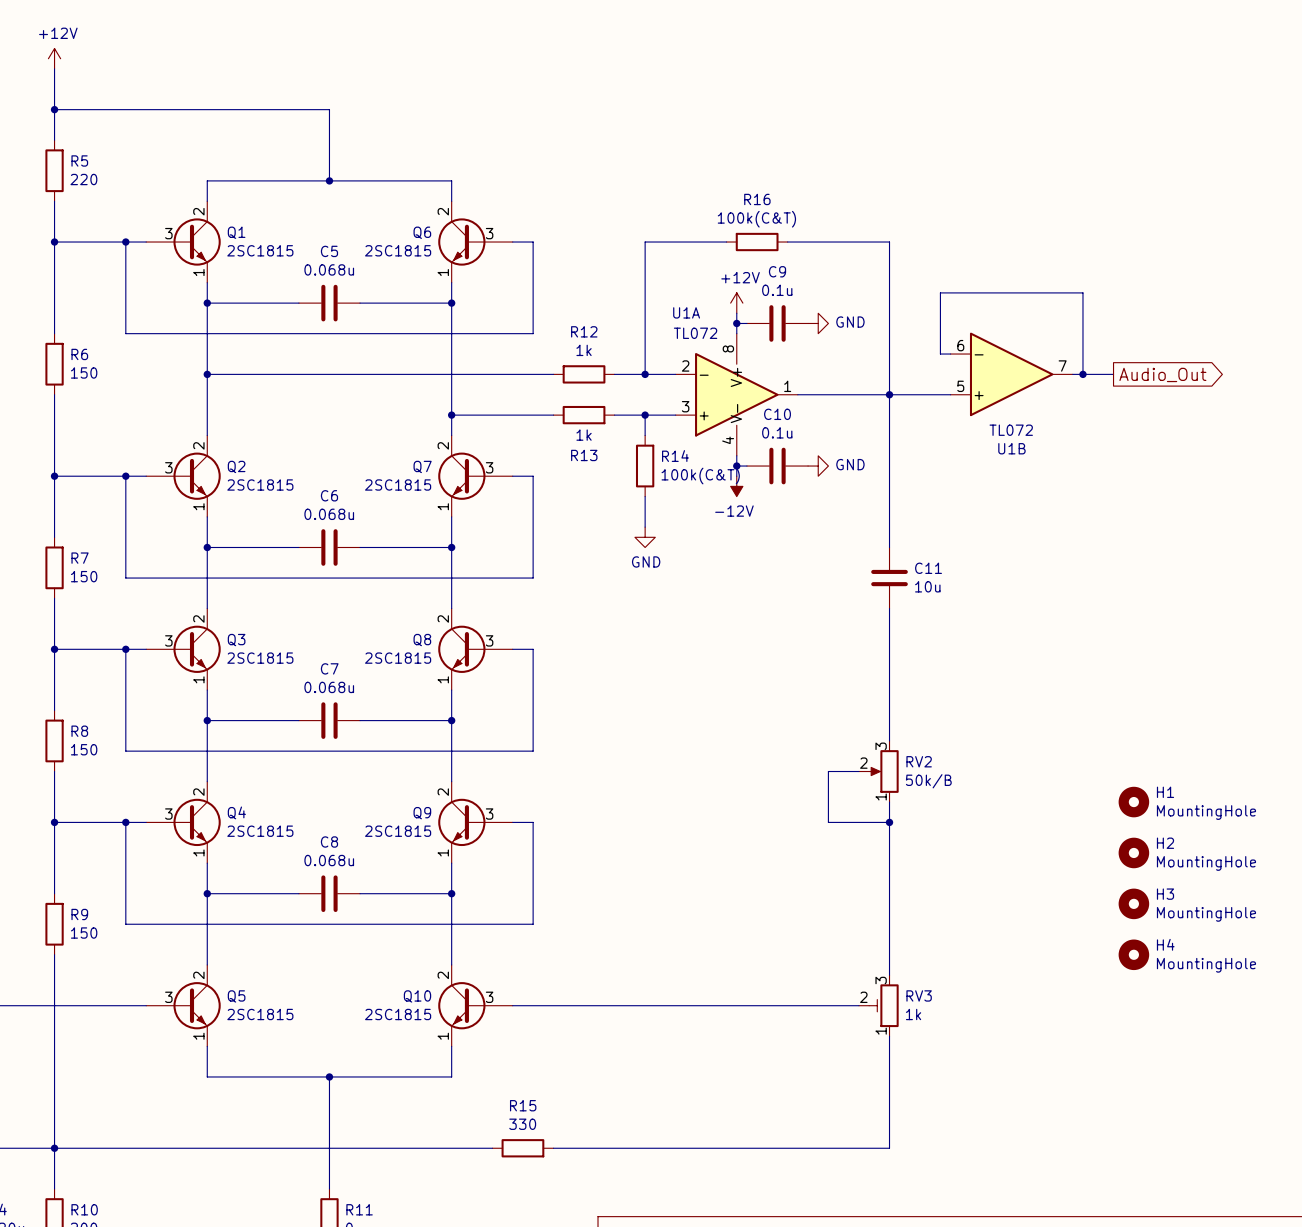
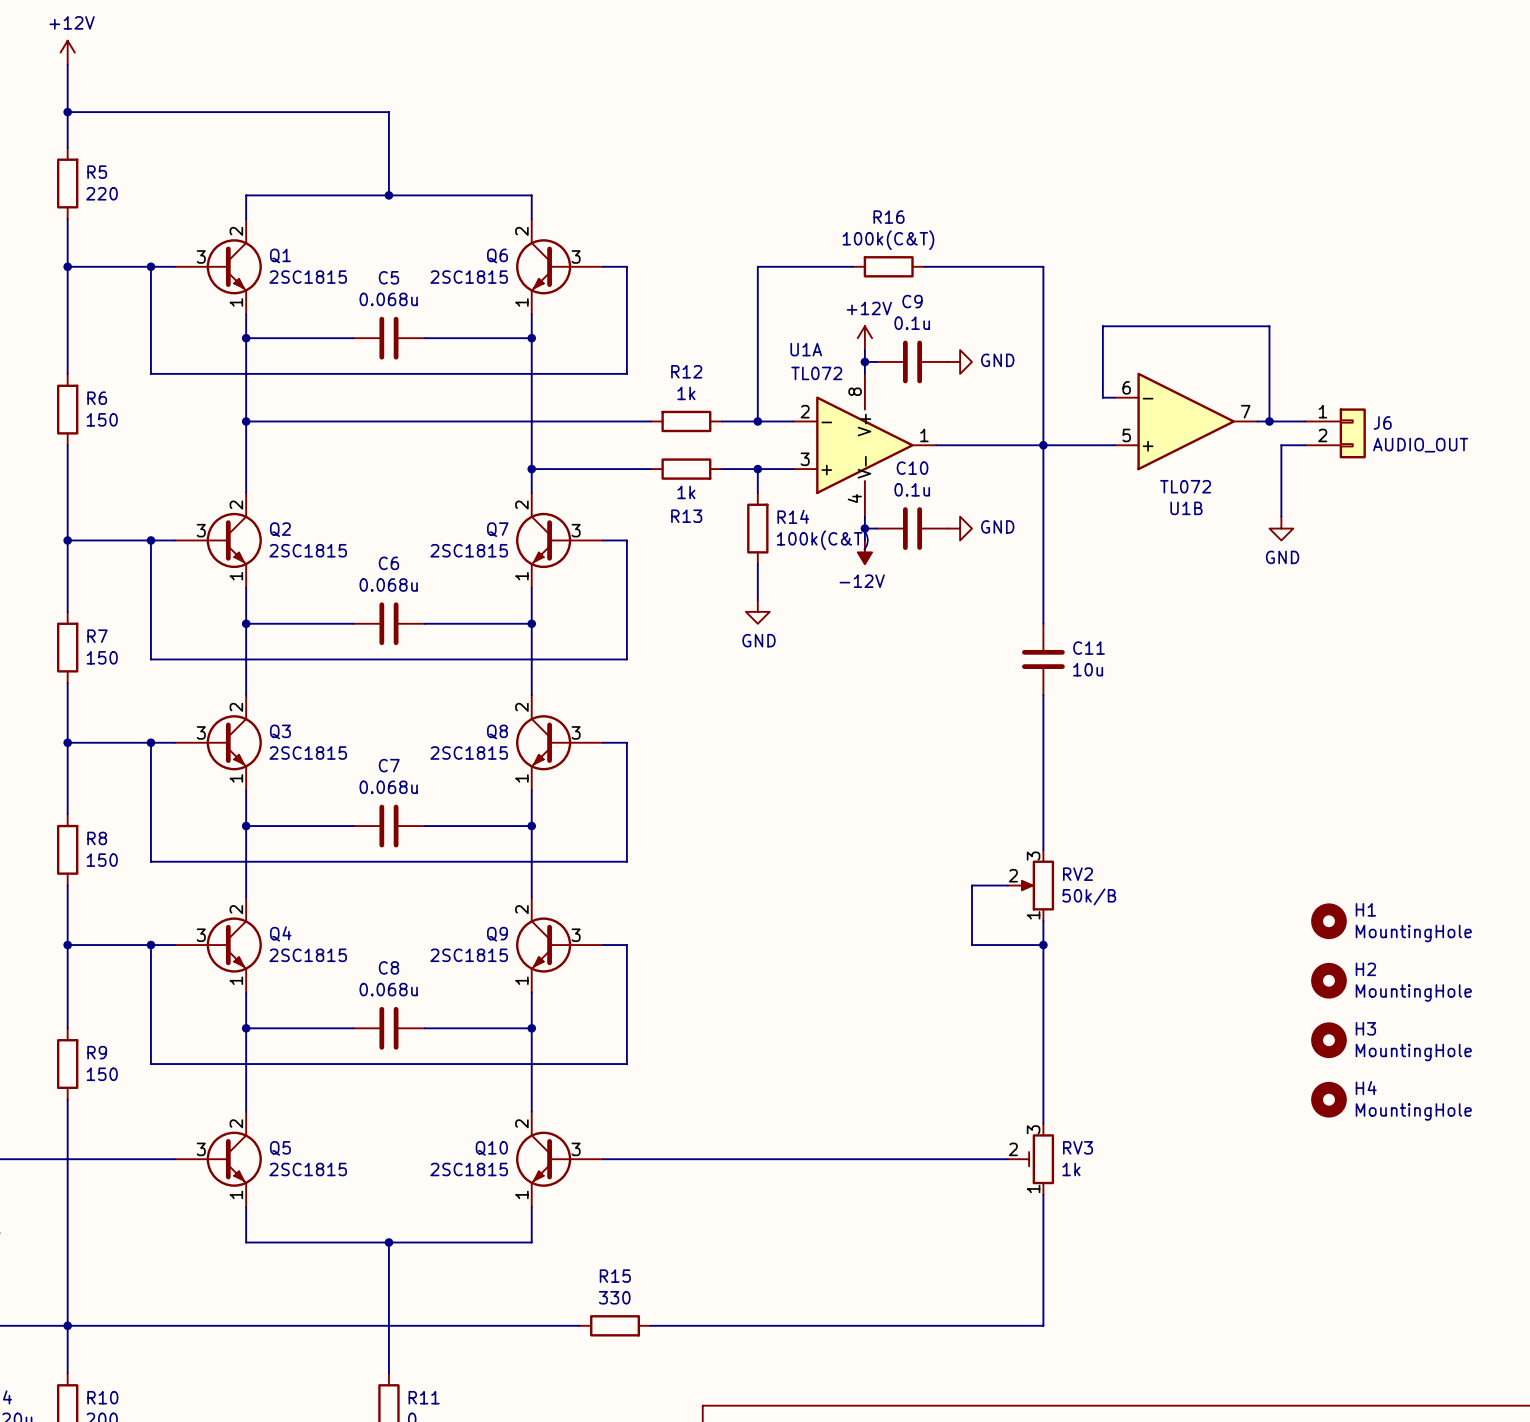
global label: Audio_Out (1162, 374) -> none
J6: none -> AUDIO_OUT (1335, 433)
wire: none -> (1305, 445) (1281, 445) (1281, 516)
power symbol: none -> GND (1281, 528)

